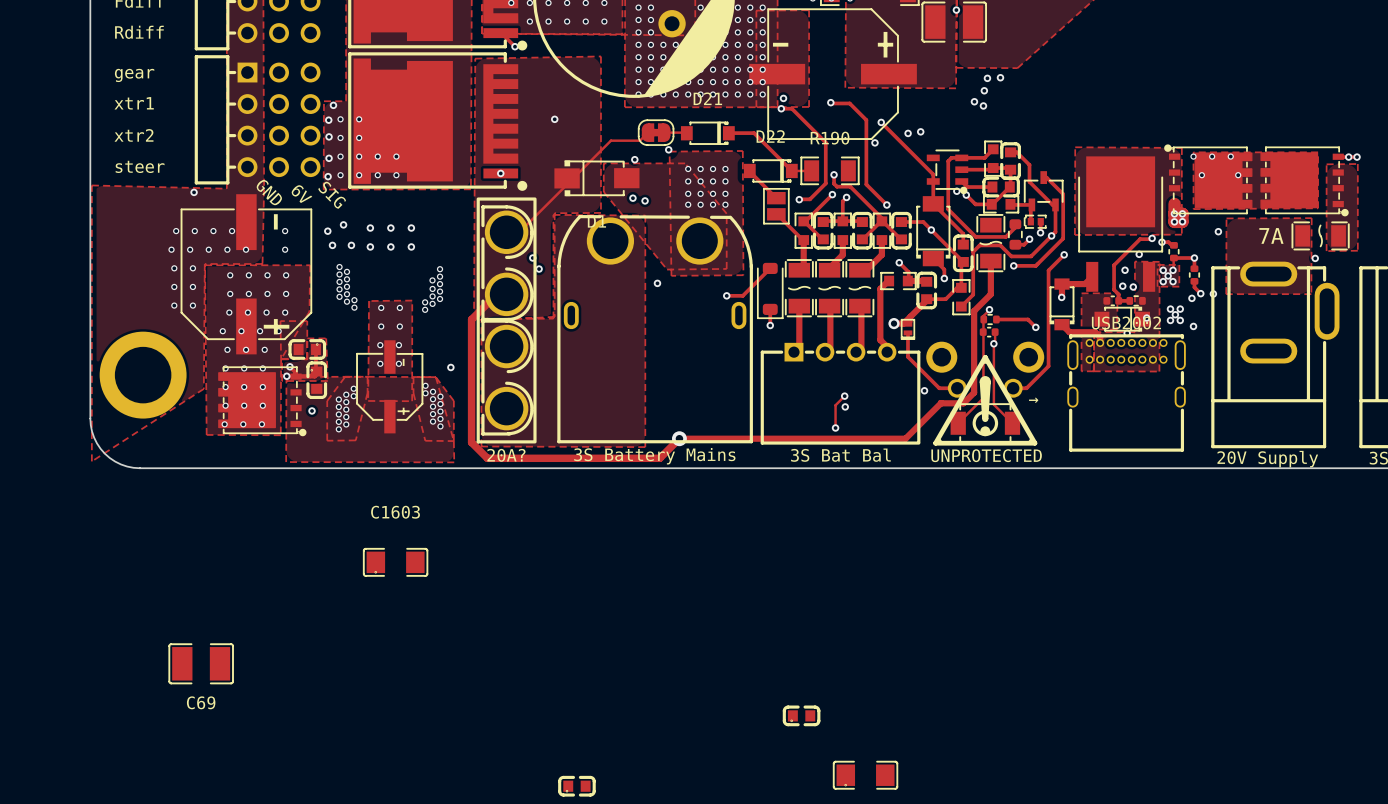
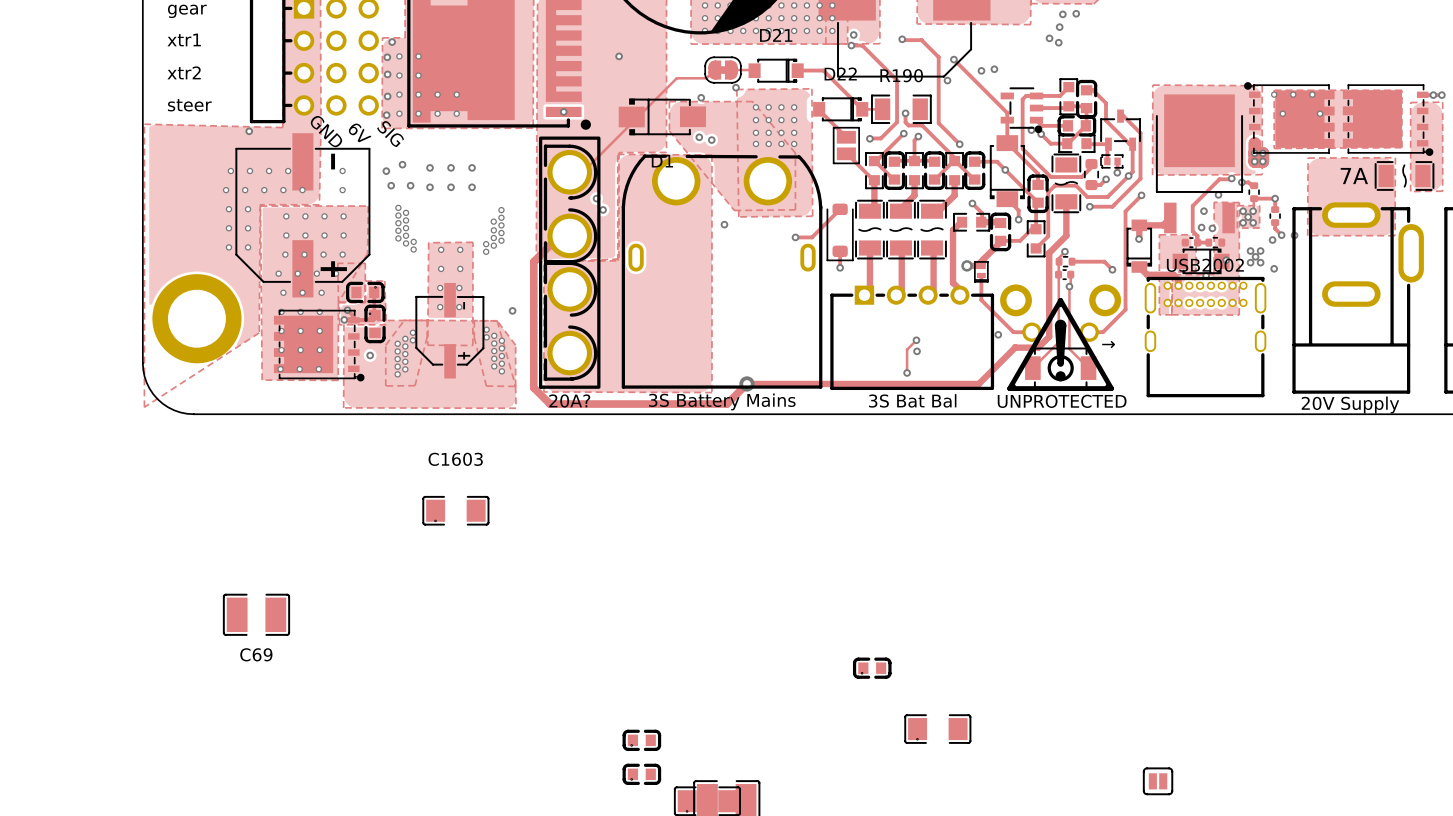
via: (1218, 231) -> none
via: (1315, 258) -> none

